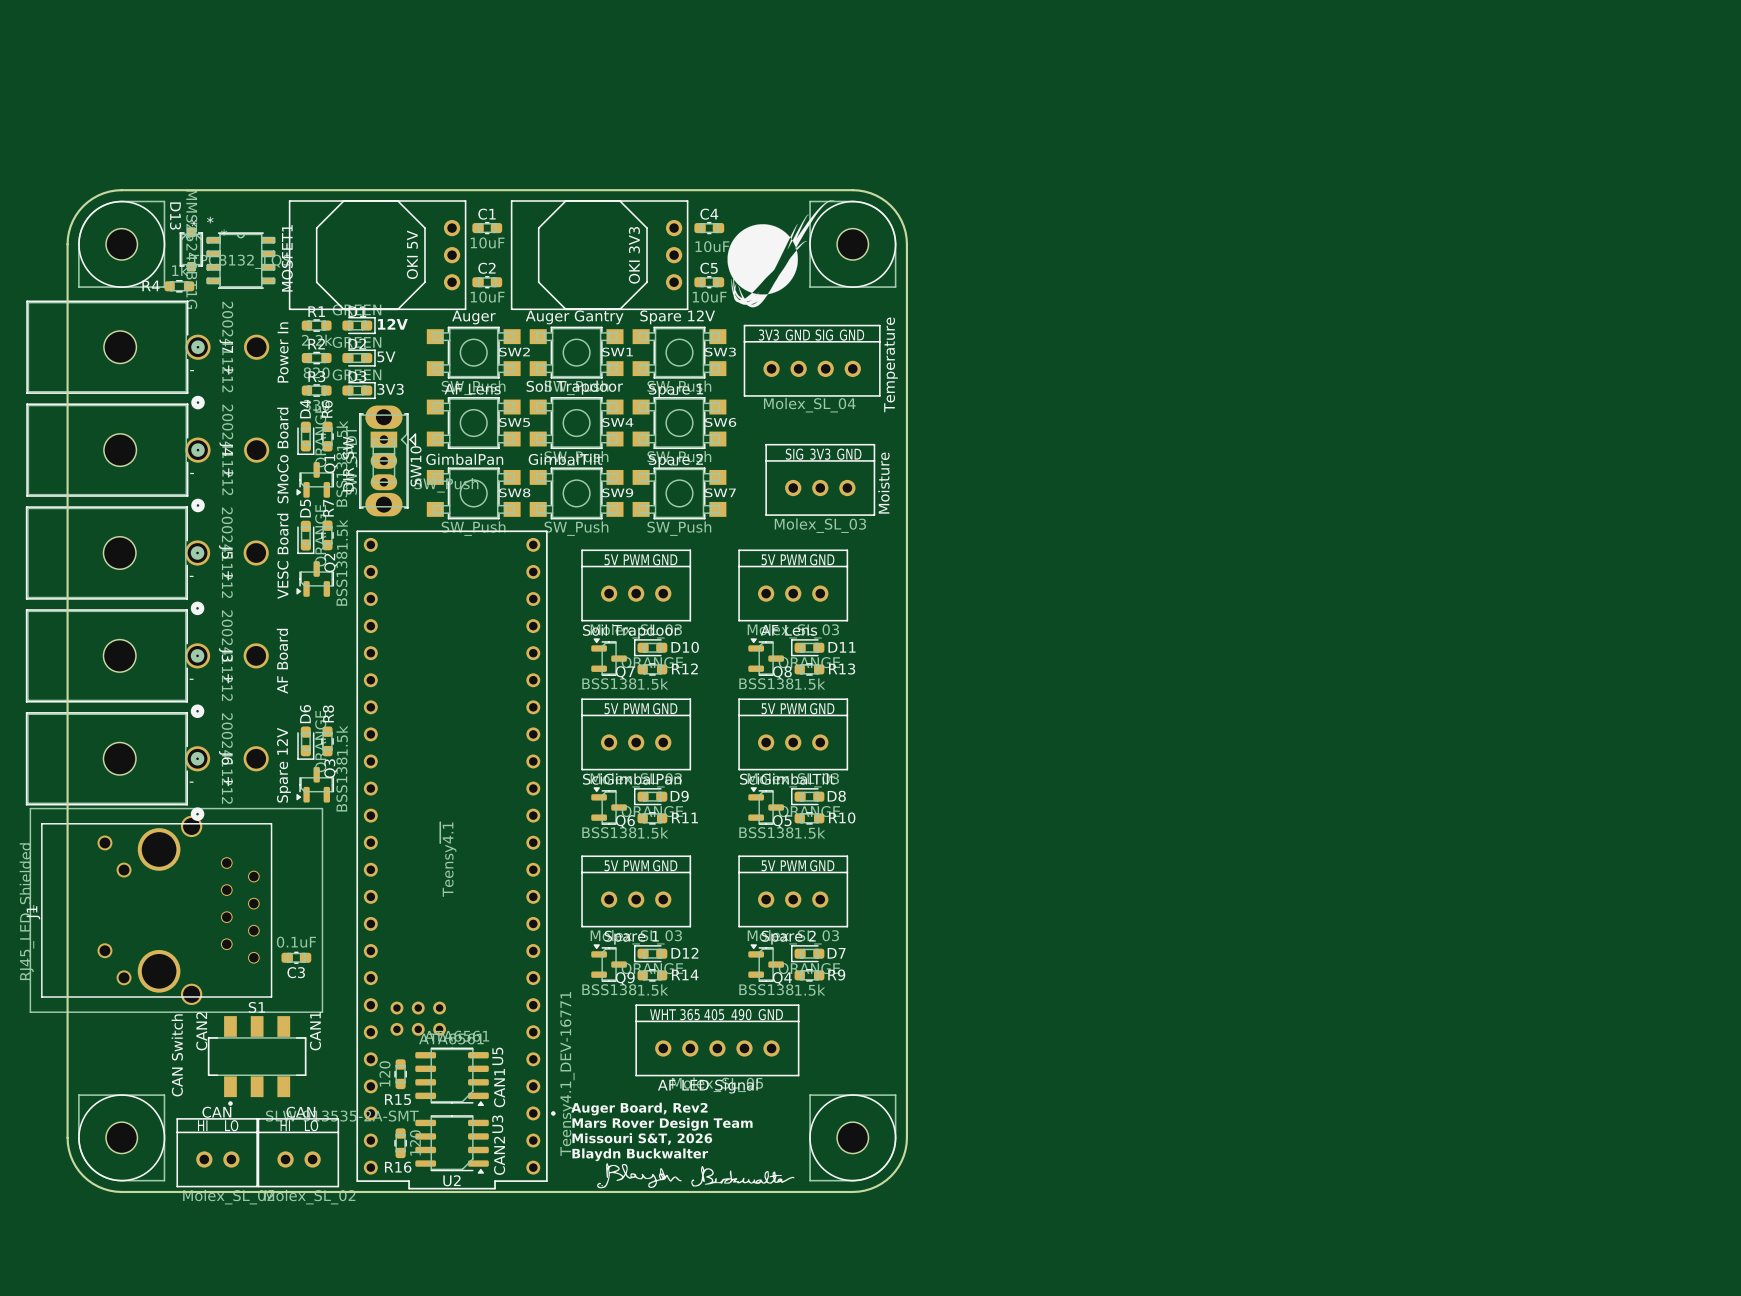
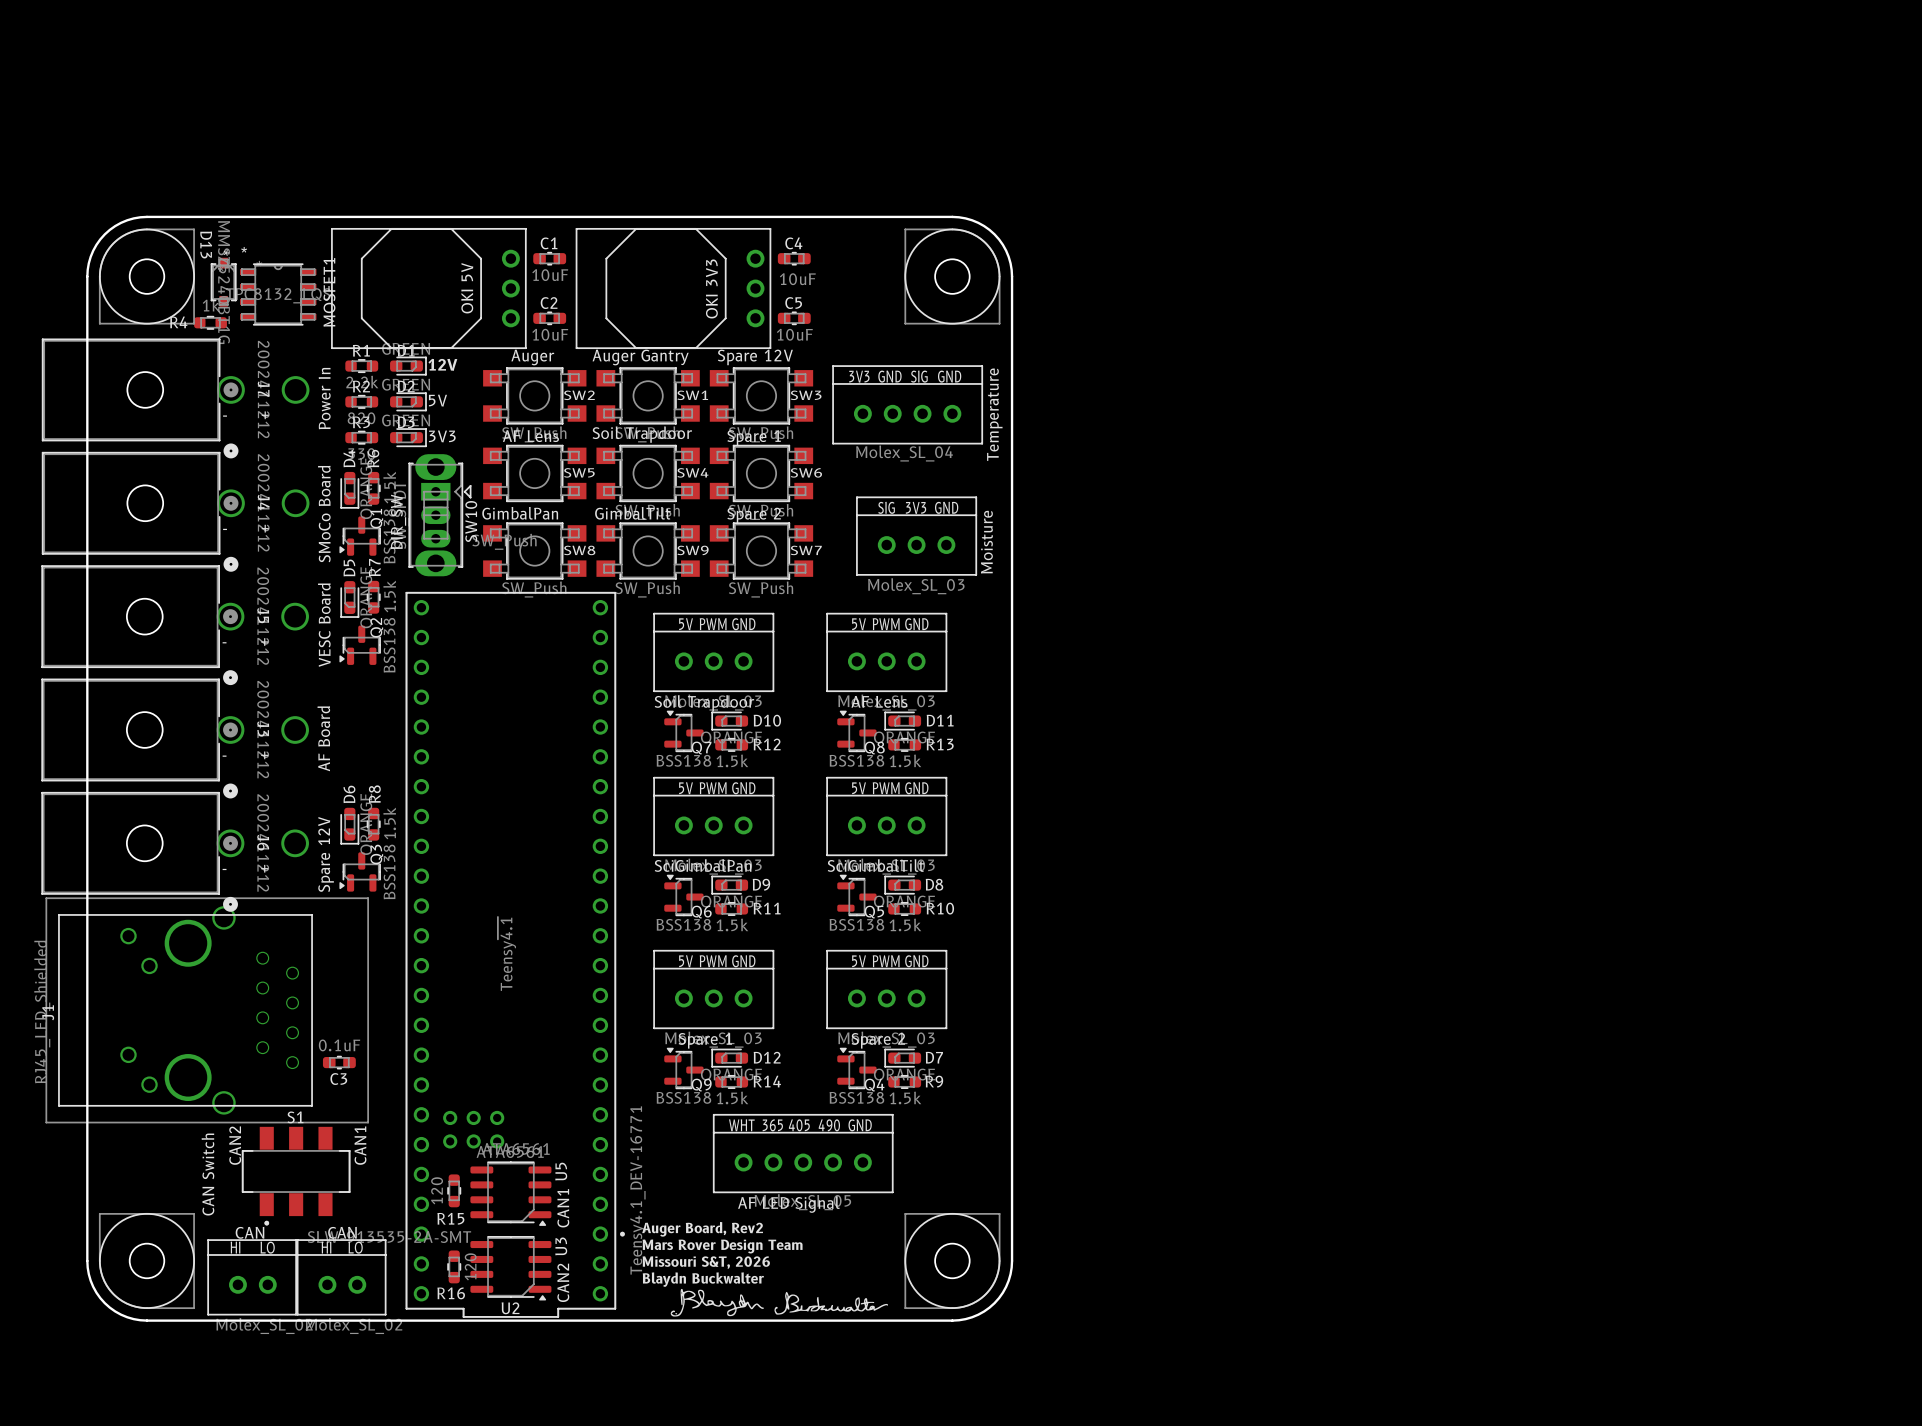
drawing: [727, 200, 835, 308] -> none

